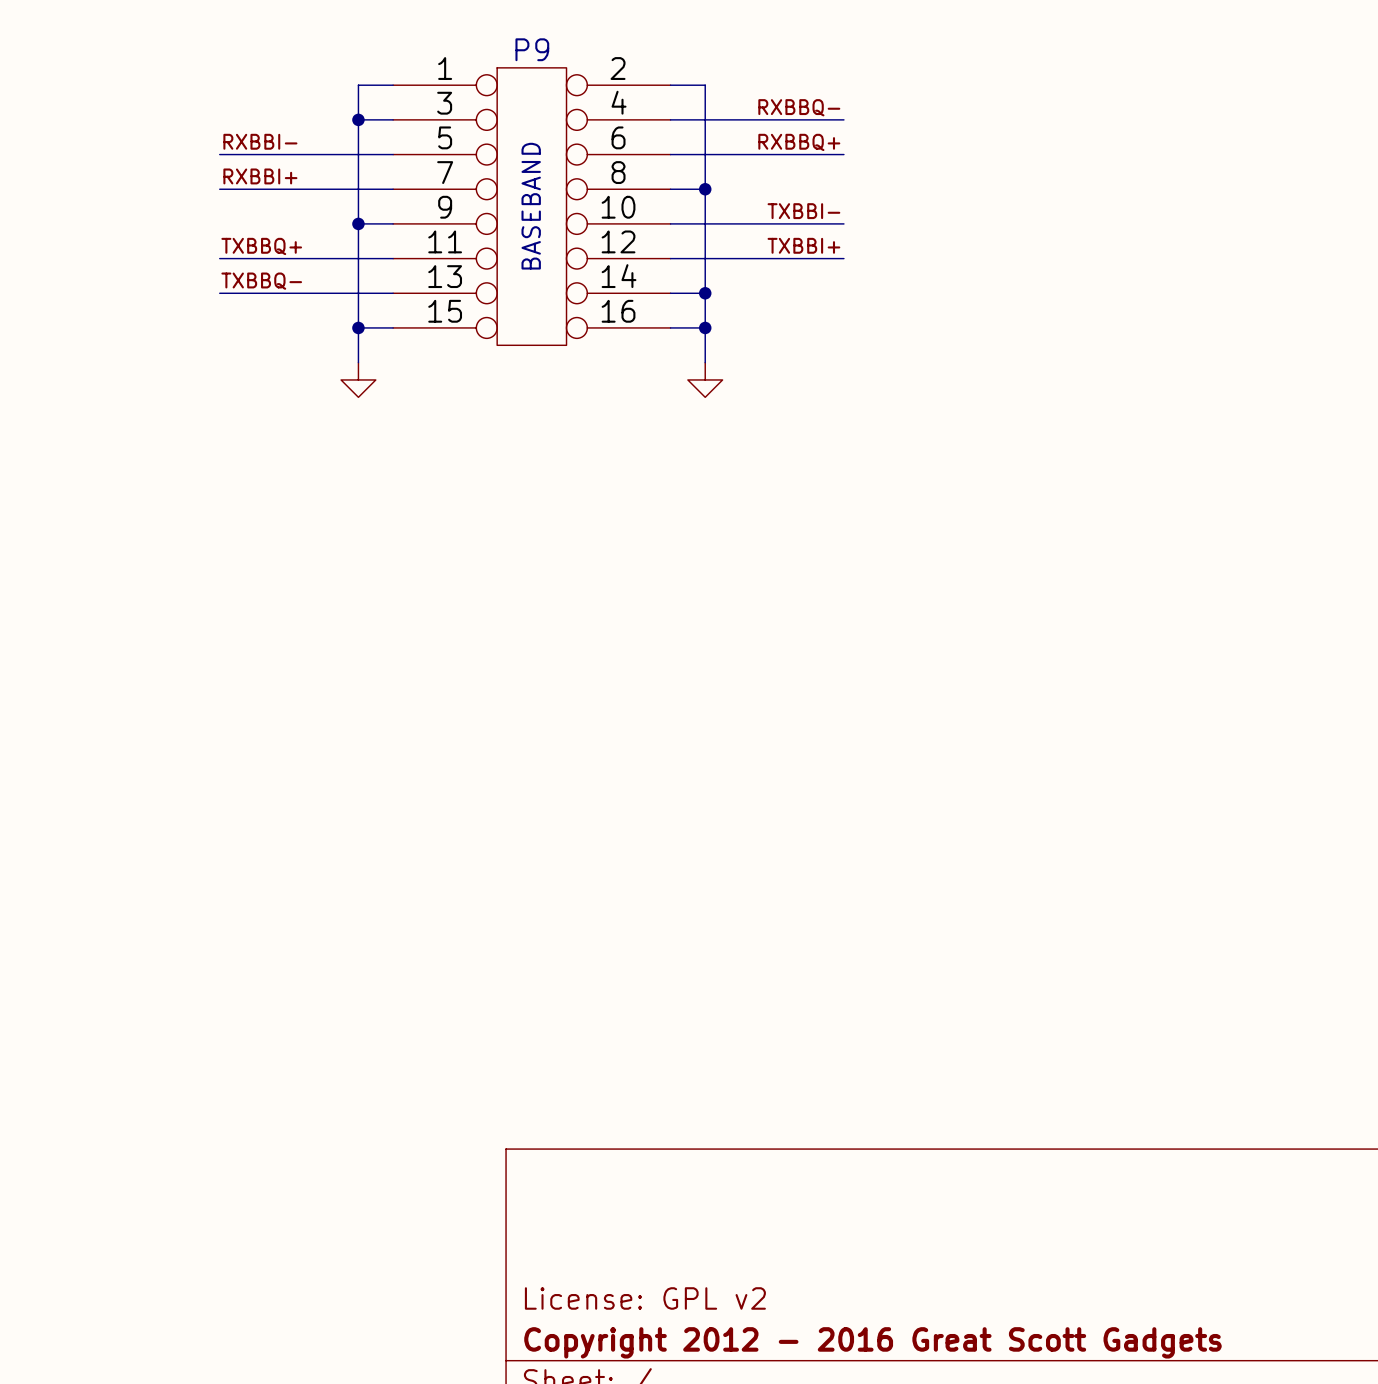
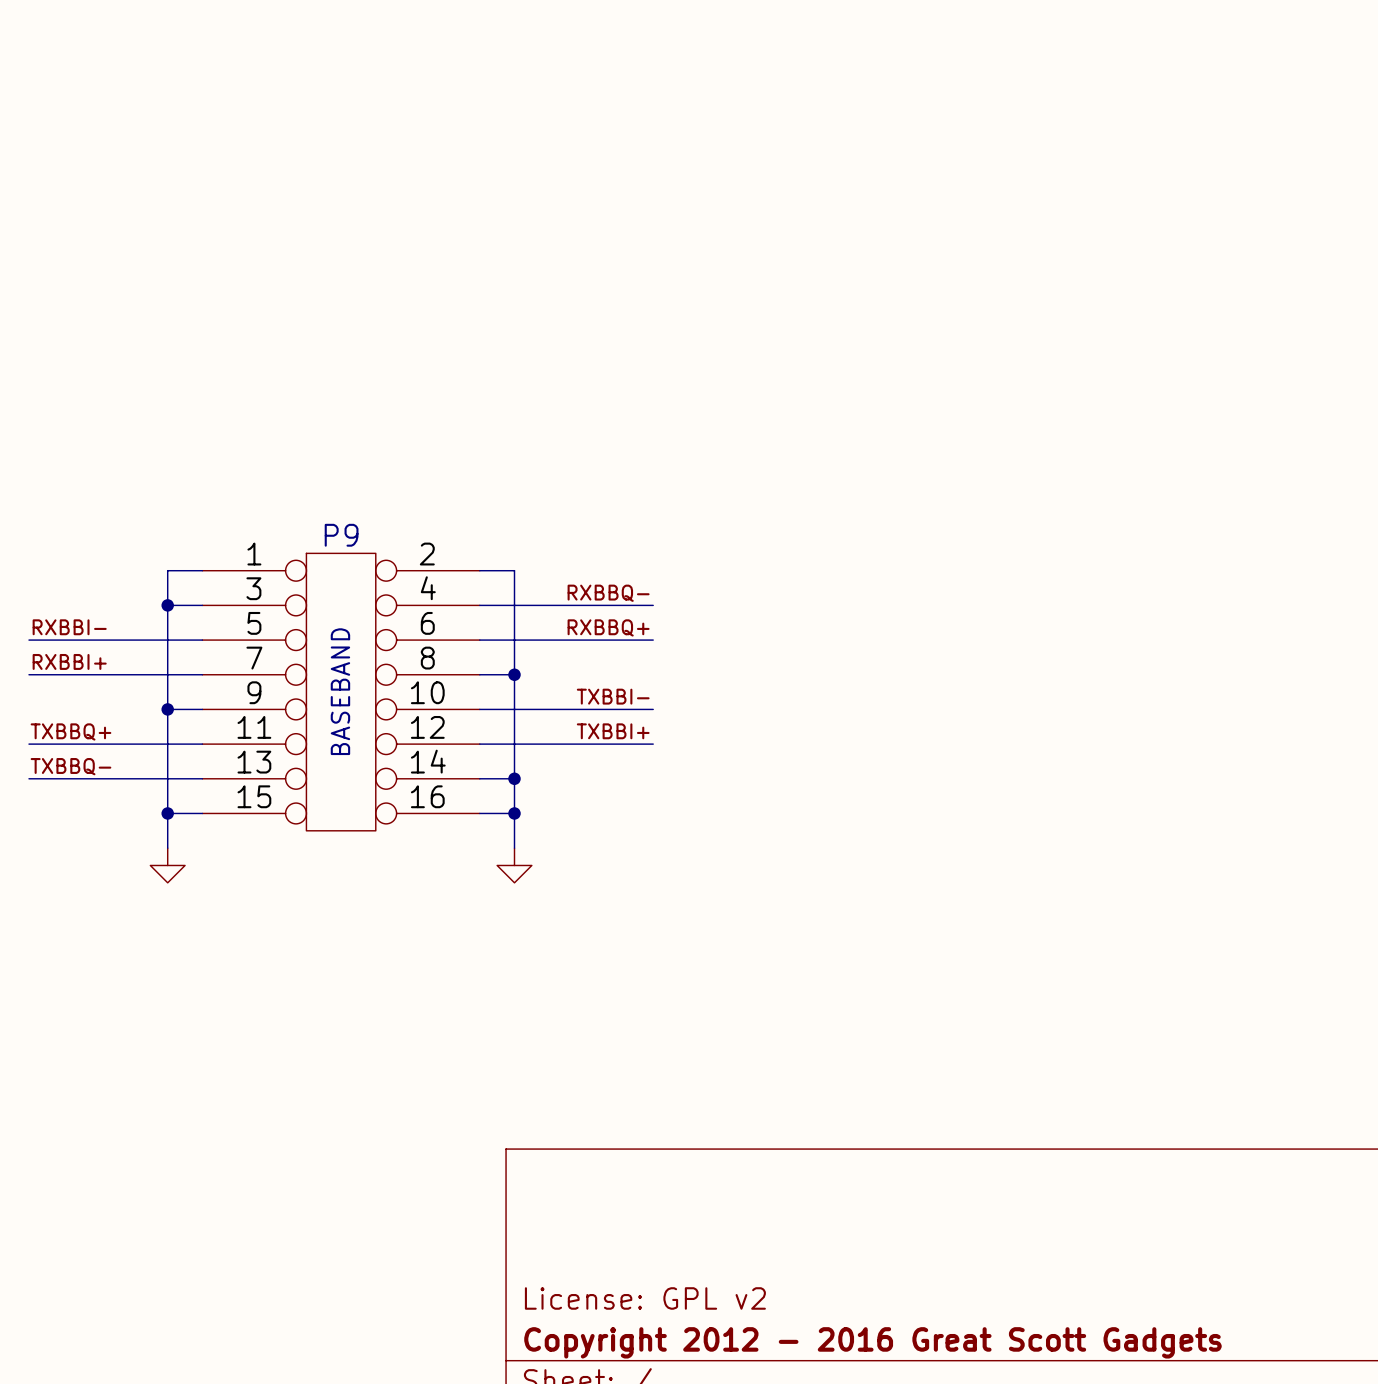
wire: (393, 85) (358, 85) (358, 362) -> none
wire: (670, 85) (705, 85) (705, 362) -> none
label: RXBBQ- (799, 107) -> none
wire: (358, 119) (393, 119) -> none
junction: (358, 119) -> none
wire: (670, 119) (843, 119) -> none
label: RXBBI- (260, 141) -> none
label: RXBBQ+ (799, 142) -> none
wire: (219, 154) (393, 154) -> none
wire: (670, 154) (843, 154) -> none
label: RXBBI+ (260, 176) -> none
wire: (219, 189) (393, 189) -> none
wire: (670, 189) (705, 189) -> none
junction: (705, 189) -> none
P9 position: (531, 206) -> (341, 692)
label: TXBBI- (803, 211) -> none
wire: (358, 223) (393, 223) -> none
junction: (358, 223) -> none
wire: (670, 223) (843, 223) -> none
label: TXBBI+ (803, 245) -> none
label: TXBBQ+ (261, 246) -> none
wire: (219, 258) (393, 258) -> none
wire: (670, 258) (843, 258) -> none
label: TXBBQ- (261, 281) -> none
wire: (219, 293) (393, 293) -> none
wire: (670, 293) (705, 293) -> none
junction: (705, 293) -> none
wire: (358, 327) (393, 327) -> (167, 605) (202, 605)
junction: (358, 327) -> none
wire: (670, 327) (705, 327) -> none
junction: (705, 327) -> none
power symbol: (358, 379) -> none
power symbol: (705, 379) -> none
wire: none -> (202, 570) (167, 570) (167, 848)
wire: none -> (479, 570) (514, 570) (514, 848)
label: none -> RXBBQ- (608, 593)
junction: none -> (167, 605)
wire: none -> (479, 605) (653, 605)
label: none -> RXBBI- (69, 627)
label: none -> RXBBQ+ (608, 627)
wire: none -> (28, 640) (202, 640)
wire: none -> (479, 640) (653, 640)
label: none -> RXBBI+ (69, 661)
wire: none -> (28, 674) (202, 674)
wire: none -> (479, 674) (514, 674)
junction: none -> (514, 674)
label: none -> TXBBI- (613, 696)
wire: none -> (167, 709) (202, 709)
junction: none -> (167, 709)
wire: none -> (479, 709) (653, 709)
label: none -> TXBBQ+ (70, 731)
label: none -> TXBBI+ (613, 731)
wire: none -> (28, 744) (202, 744)
wire: none -> (479, 744) (653, 744)
label: none -> TXBBQ- (70, 766)
wire: none -> (28, 778) (202, 778)
wire: none -> (479, 778) (514, 778)
junction: none -> (514, 778)
wire: none -> (167, 813) (202, 813)
junction: none -> (167, 813)
wire: none -> (479, 813) (514, 813)
junction: none -> (514, 813)
power symbol: none -> (167, 865)
power symbol: none -> (514, 865)

